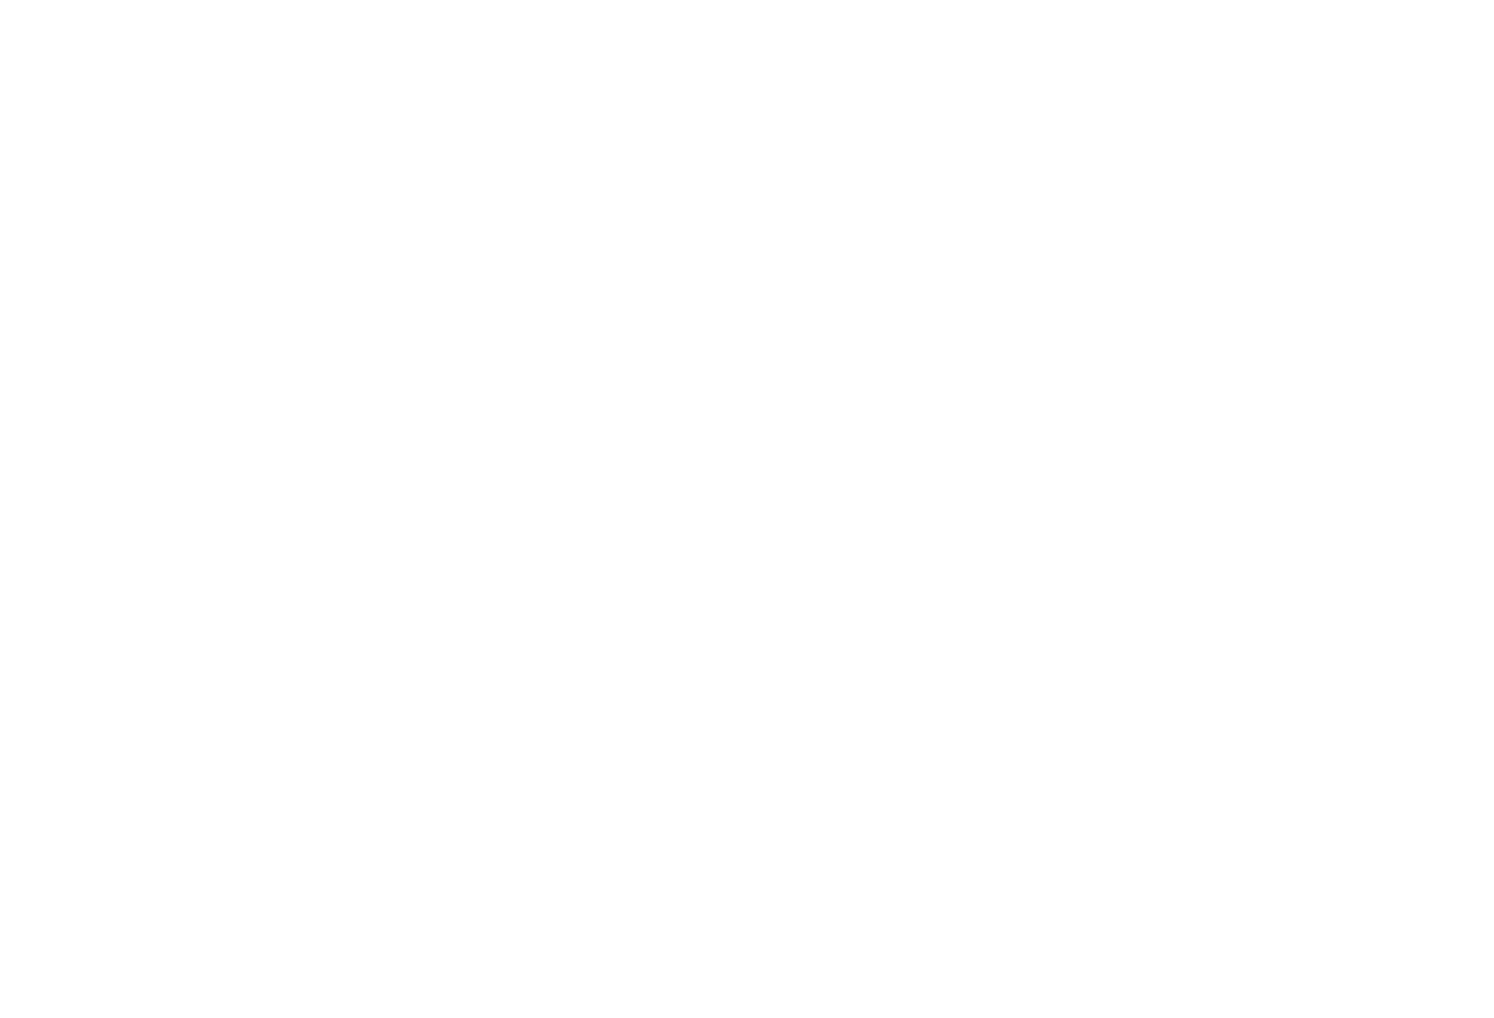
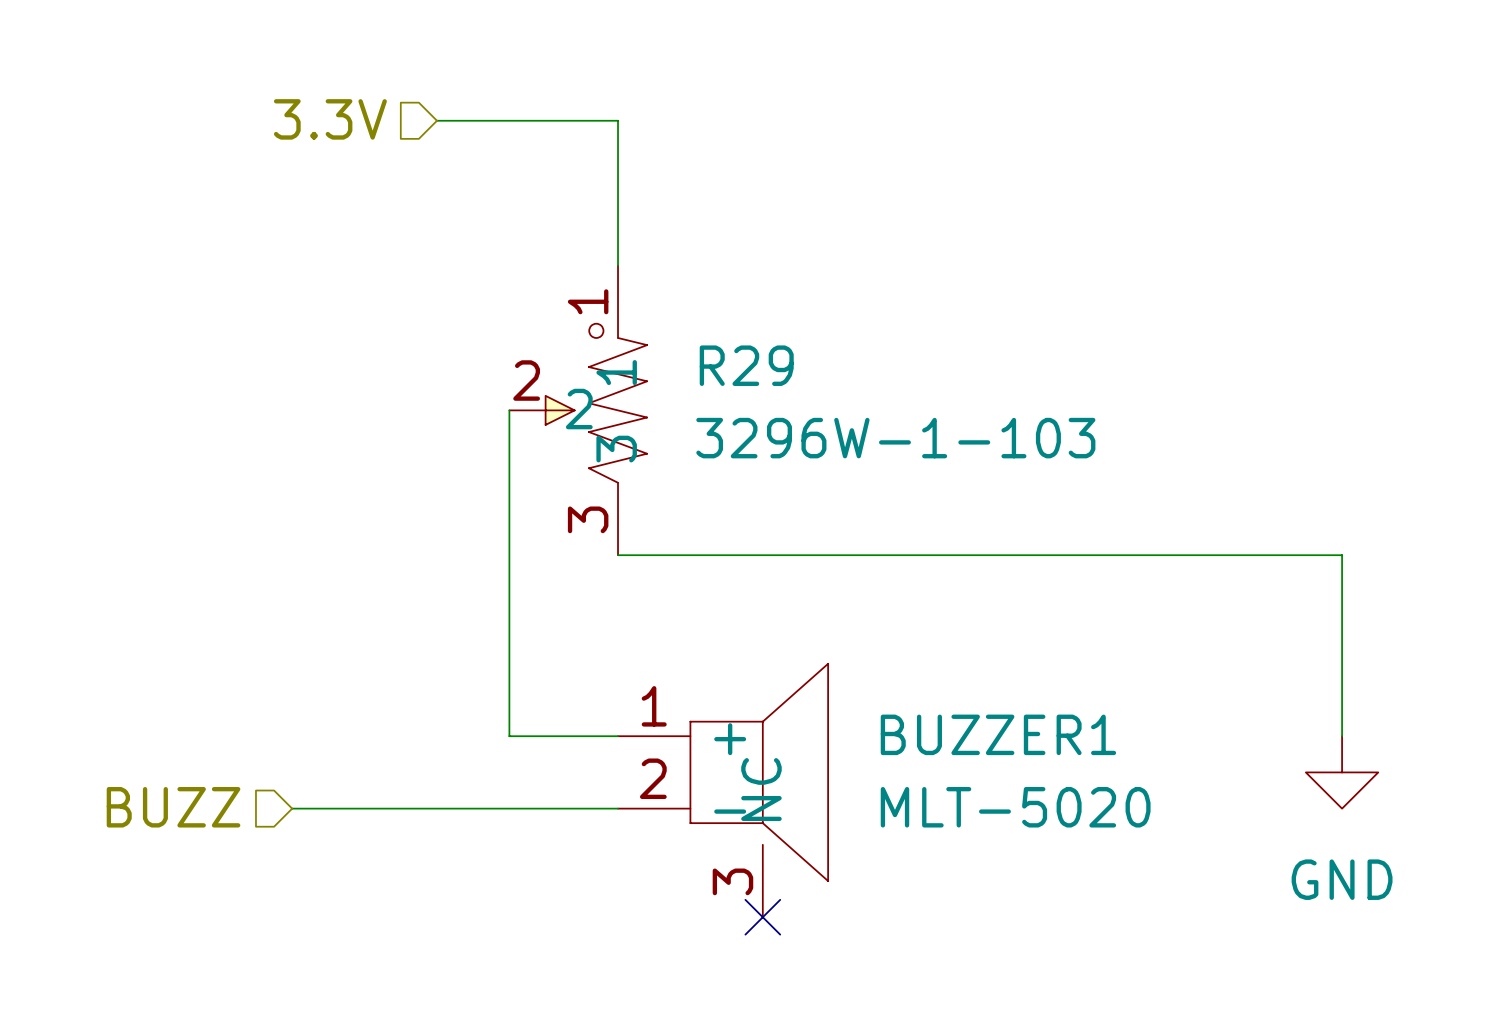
hierarchical label: none -> 3.3V (330, 119)
wire: none -> (436, 120) (618, 120) (618, 265)
wire: none -> (509, 410) (509, 736) (618, 736)
R29: none -> 3296W-1-103 (578, 410)
wire: none -> (618, 555) (1342, 555) (1342, 736)
power symbol: none -> GND (1342, 772)
BUZZER1: none -> MLT-5020 (723, 790)
hierarchical label: none -> BUZZ (173, 807)
wire: none -> (292, 808) (618, 808)
no-connect mark: none -> (762, 917)

